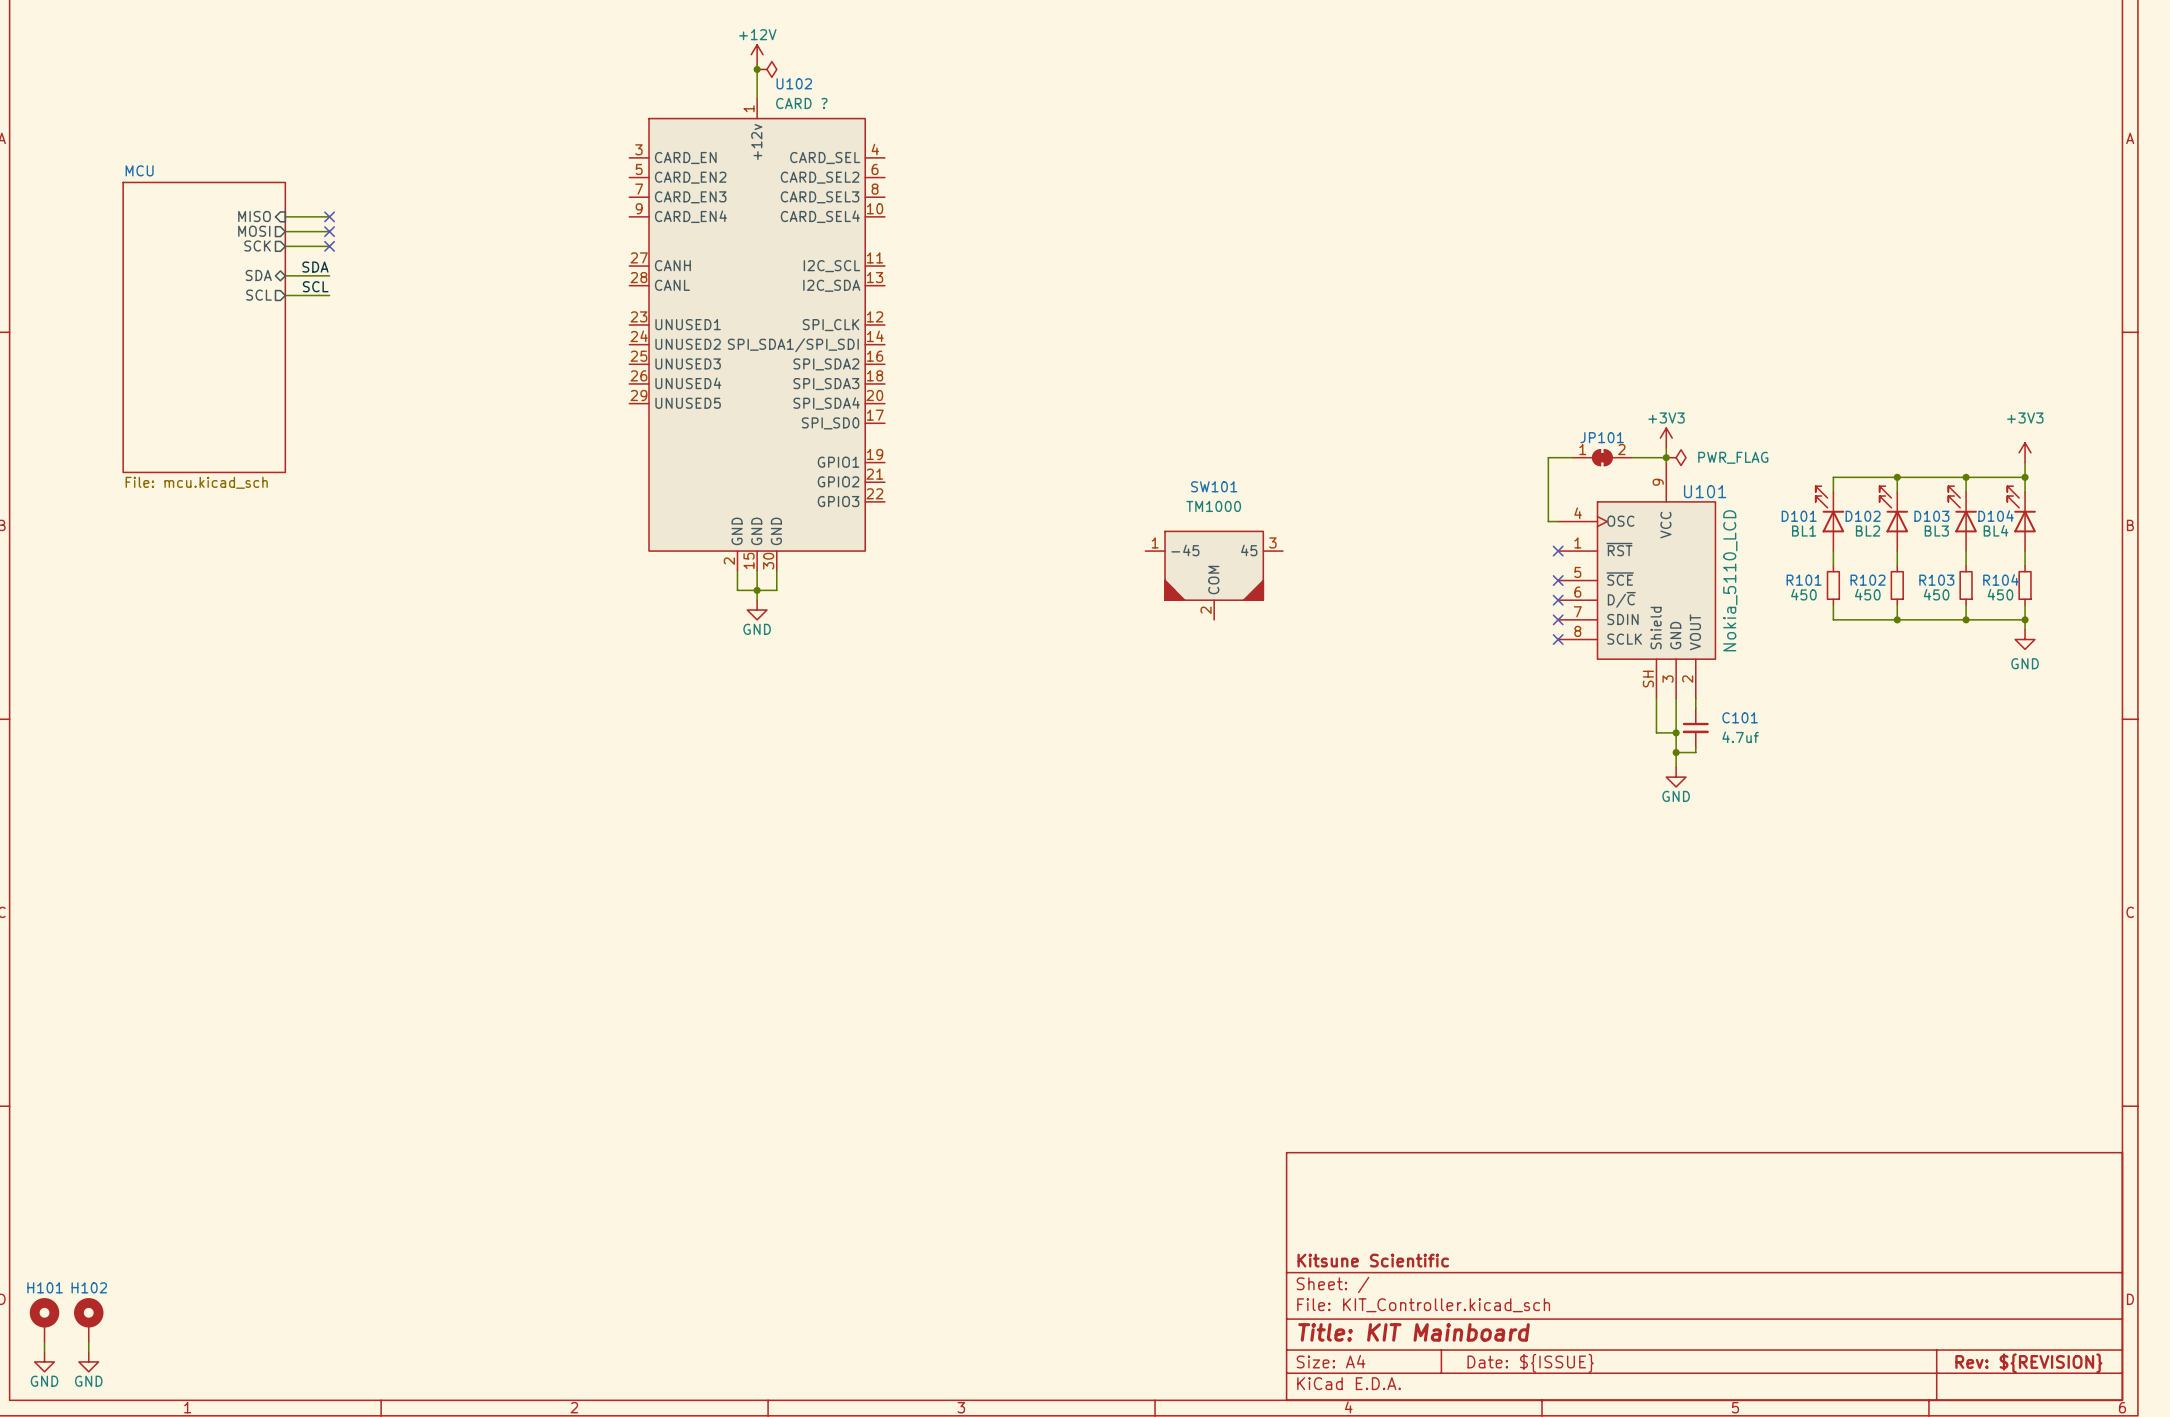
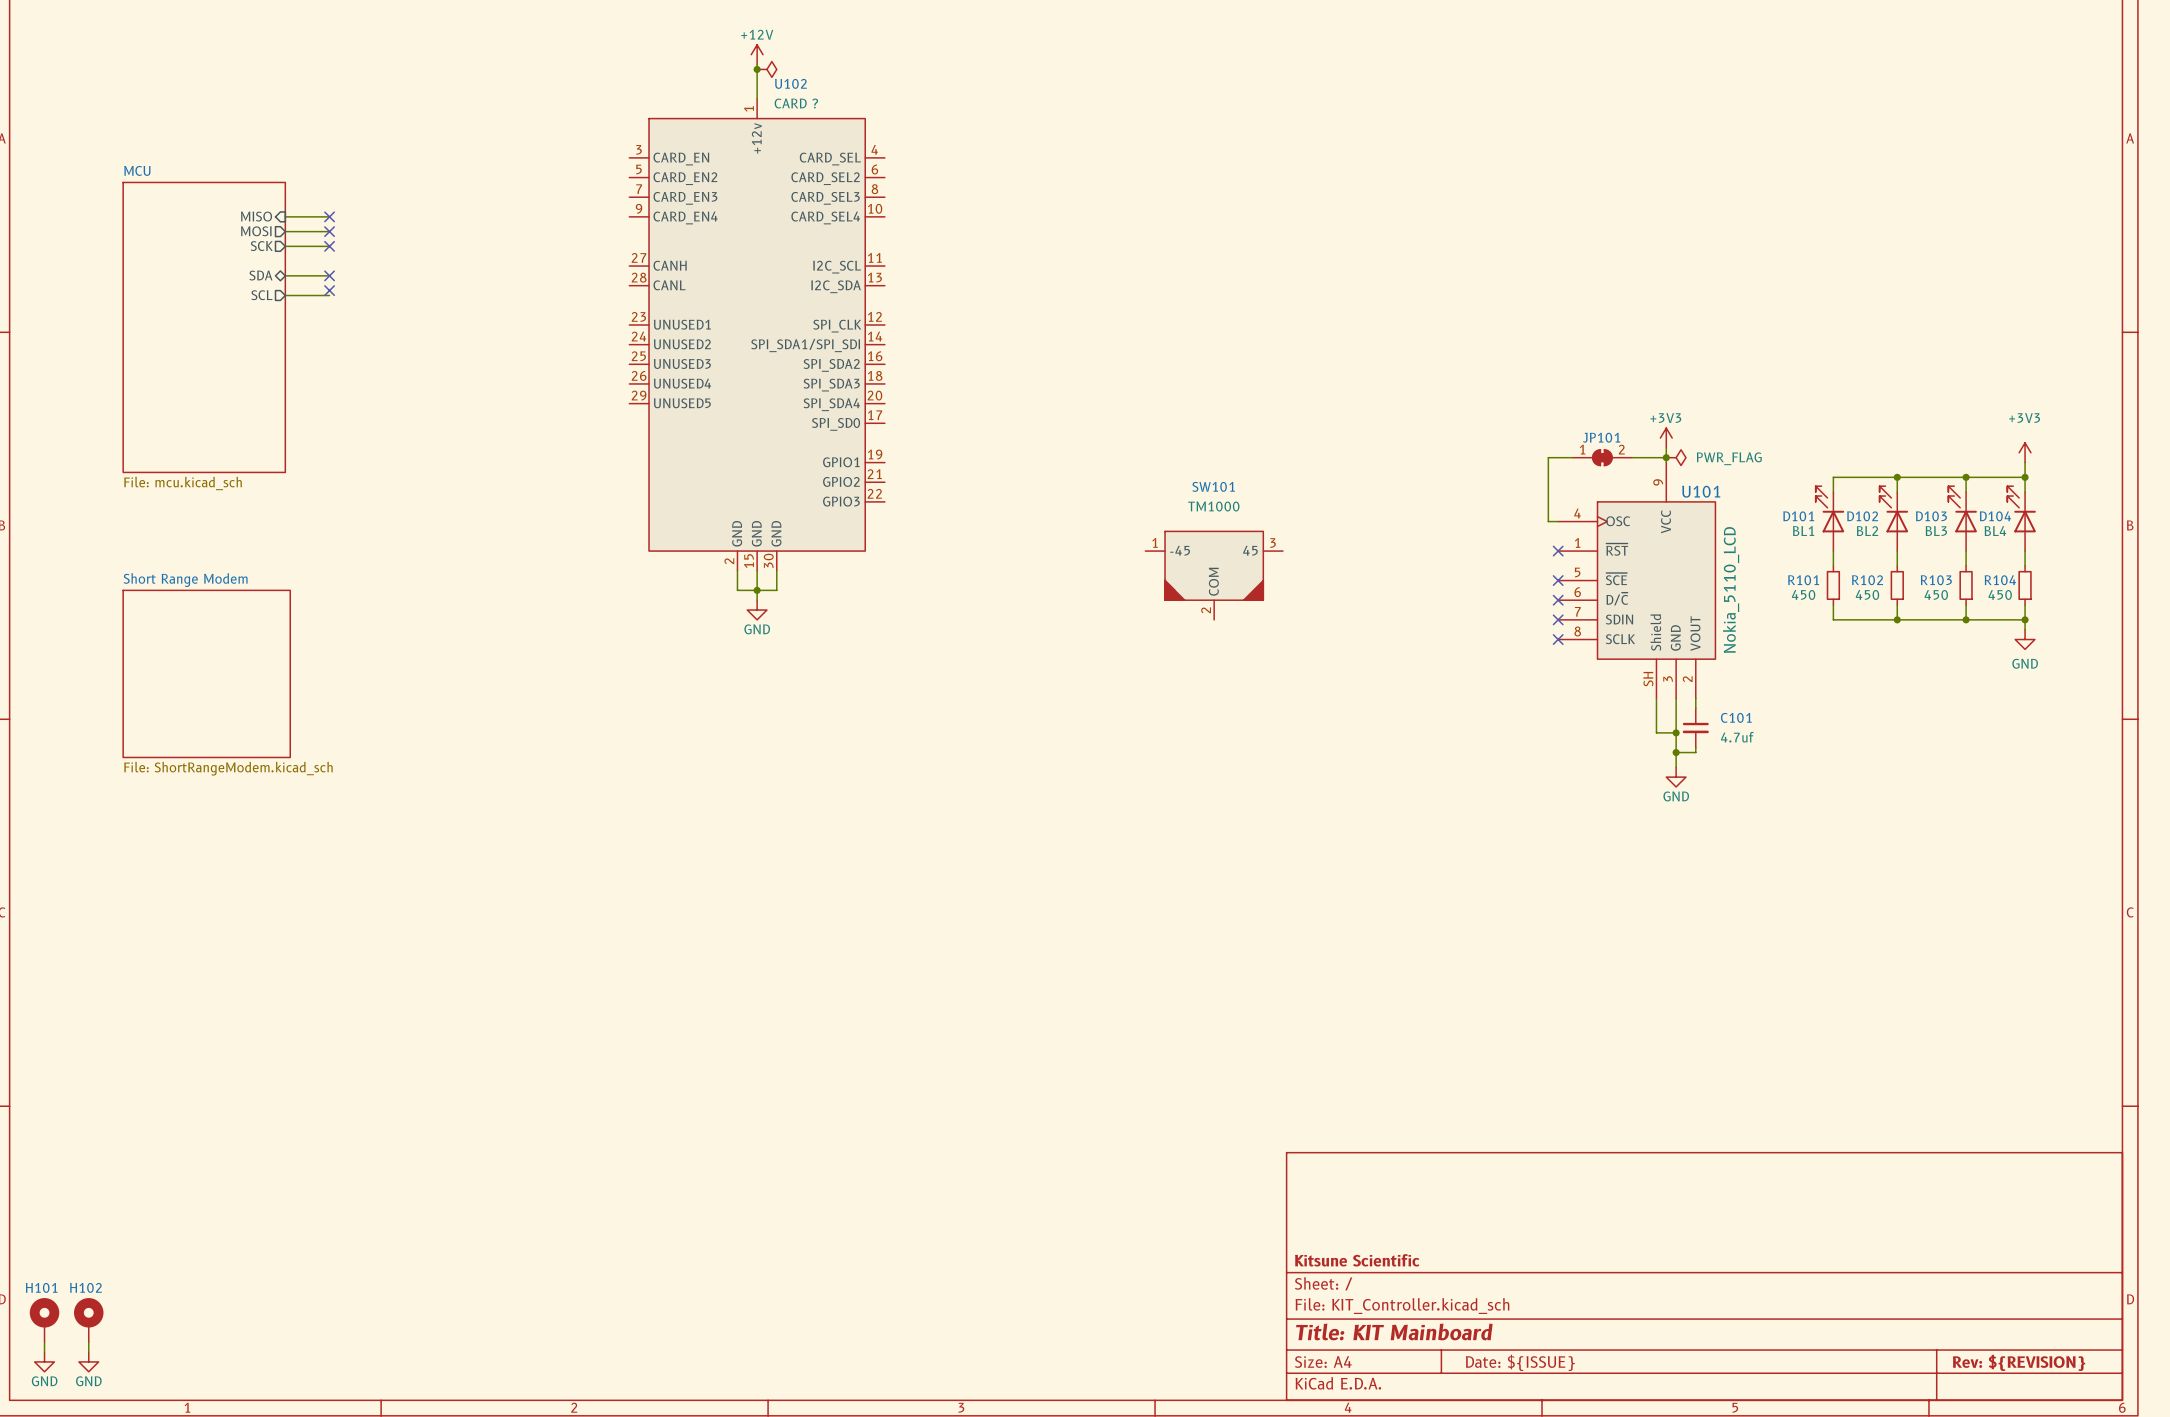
label: SDA (315, 267) -> none
no-connect mark: none -> (329, 275)
label: SCL (315, 286) -> none
no-connect mark: none -> (329, 290)
sheet Short Range Modem: none -> File: ShortRangeModem.kicad_sch (206, 673)

